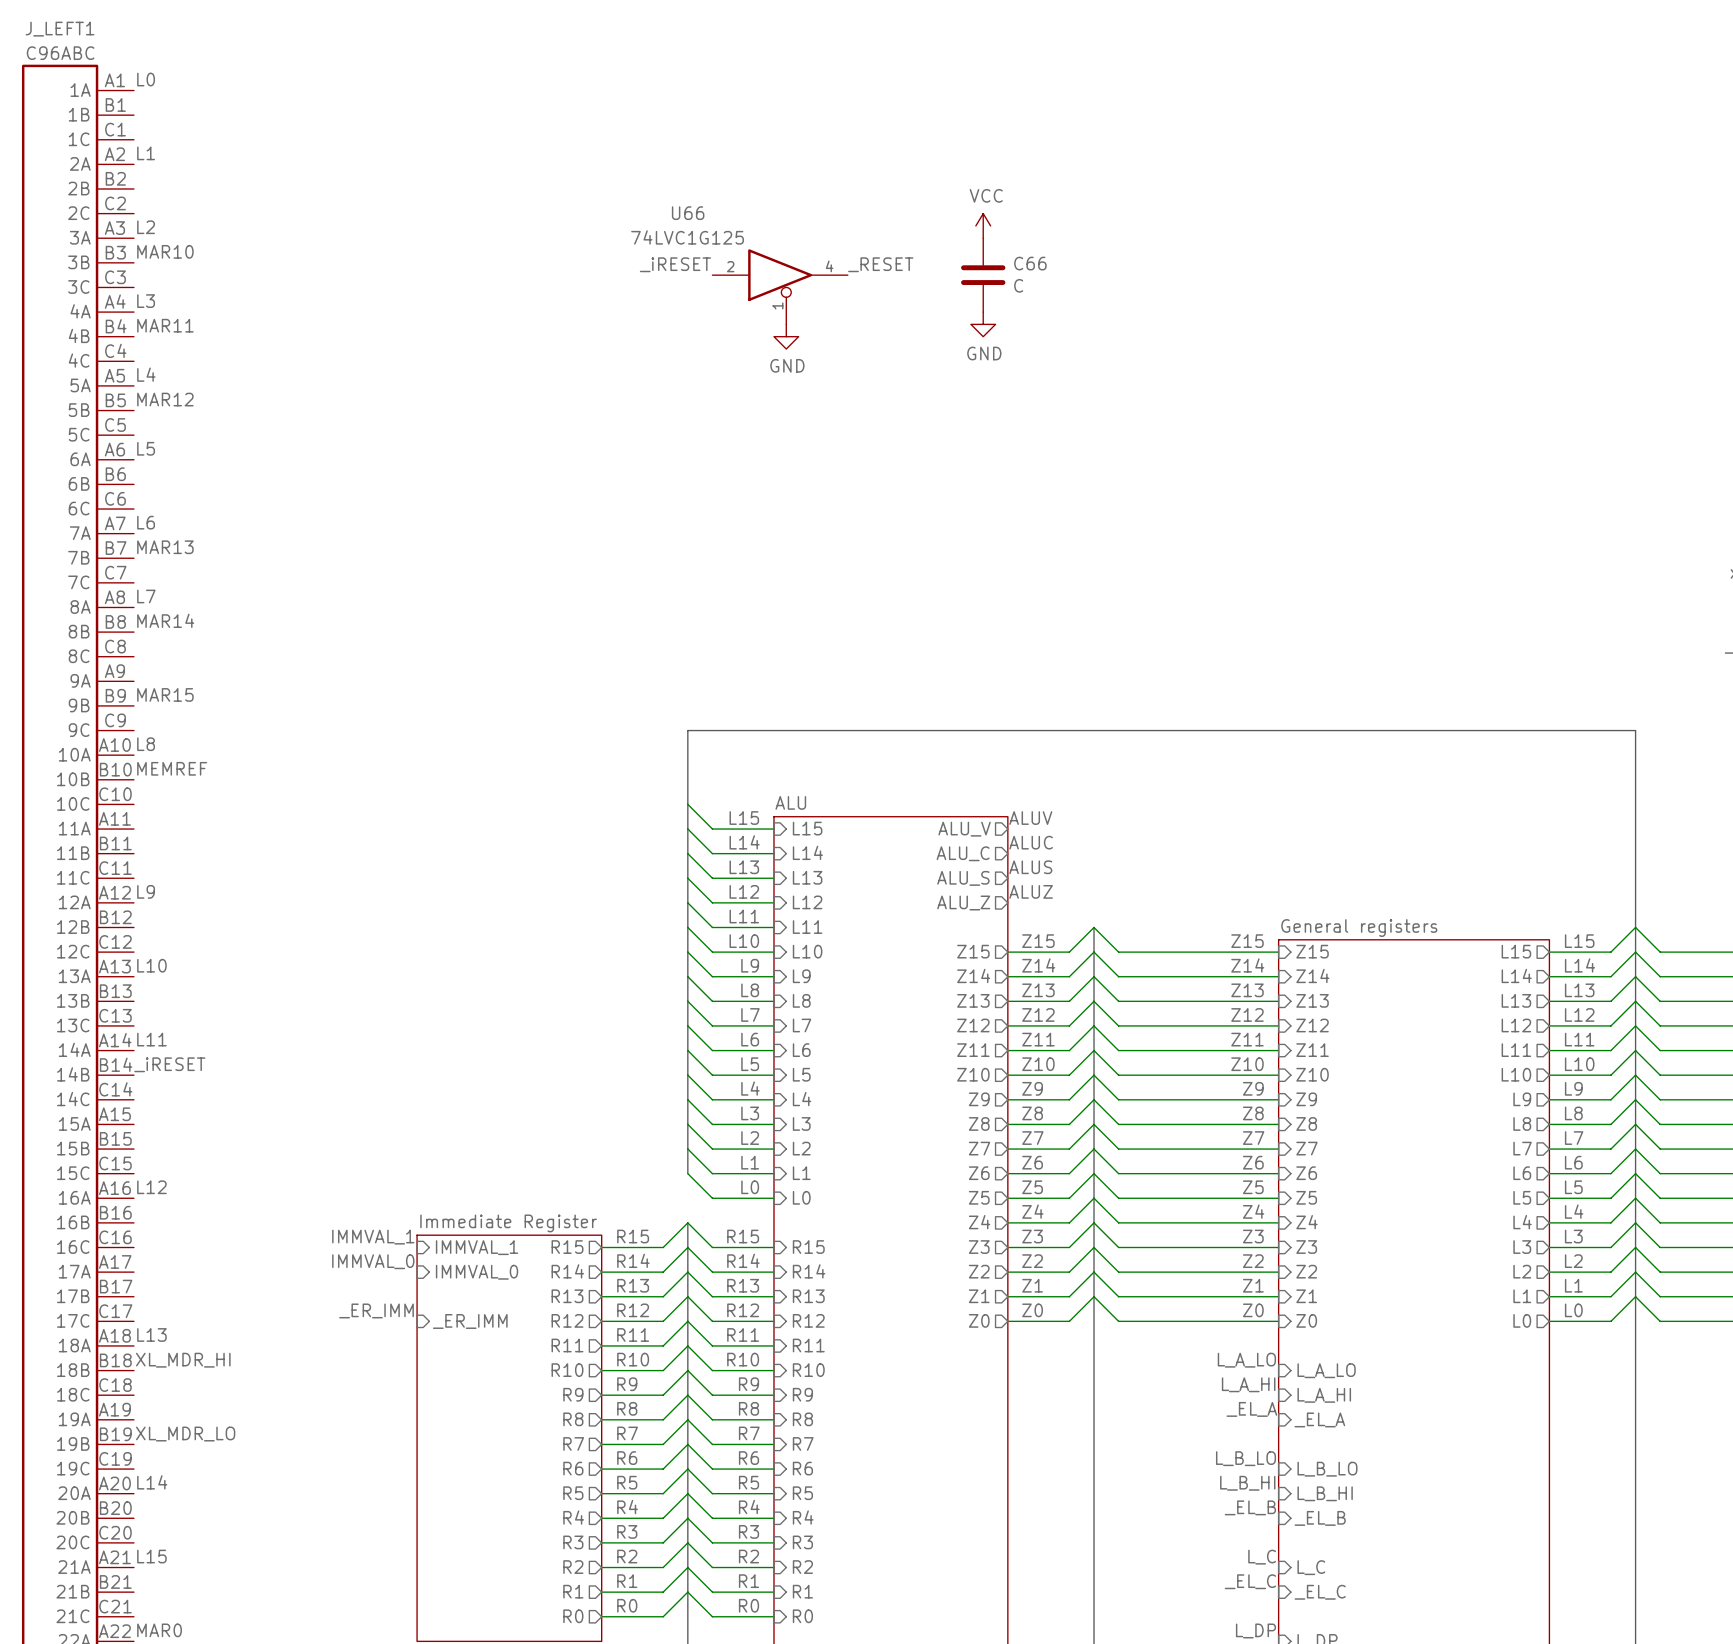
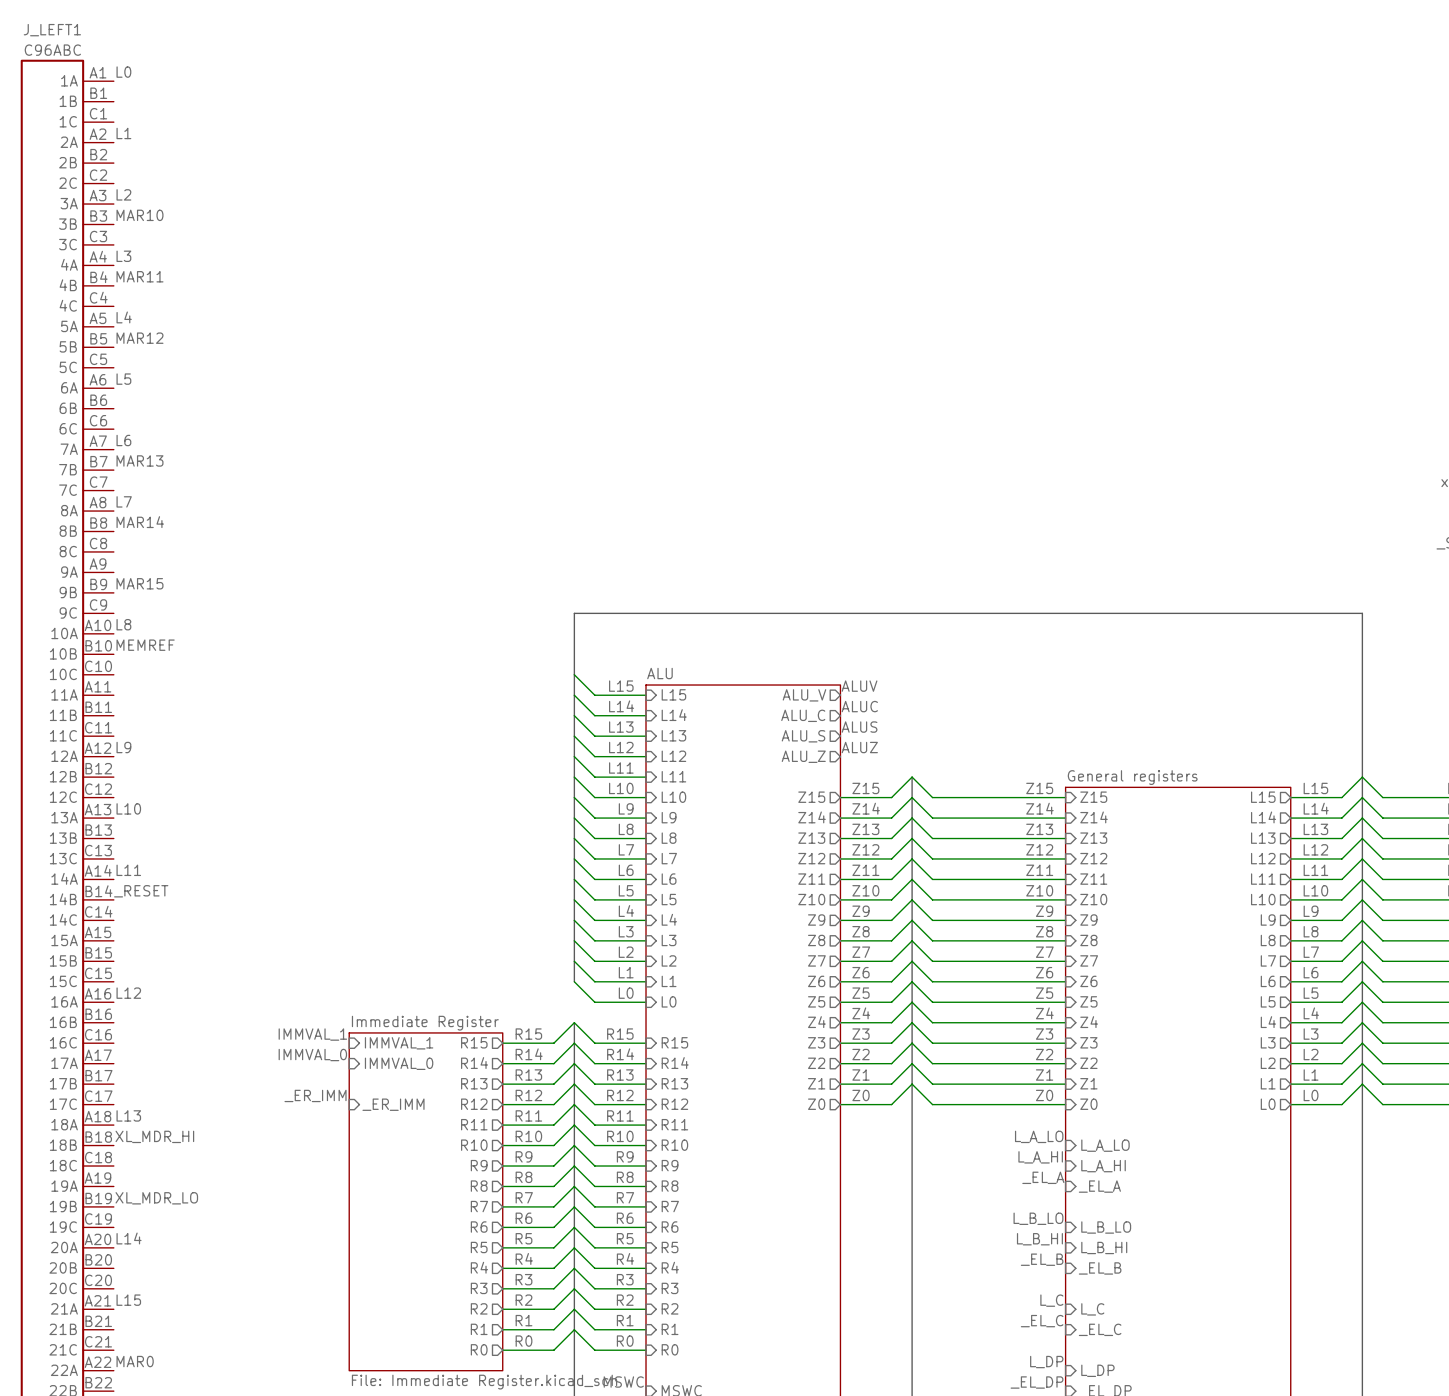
power symbol: VCC (983, 225) -> none
label: _iRESET (675, 264) -> none
label: _RESET (880, 264) -> none
C66: C (983, 275) -> none
U66: 74LVC1G125 (780, 286) -> none
power symbol: GND (983, 324) -> none
power symbol: GND (786, 336) -> none
label: _iRESET (169, 1064) -> _RESET (141, 891)

